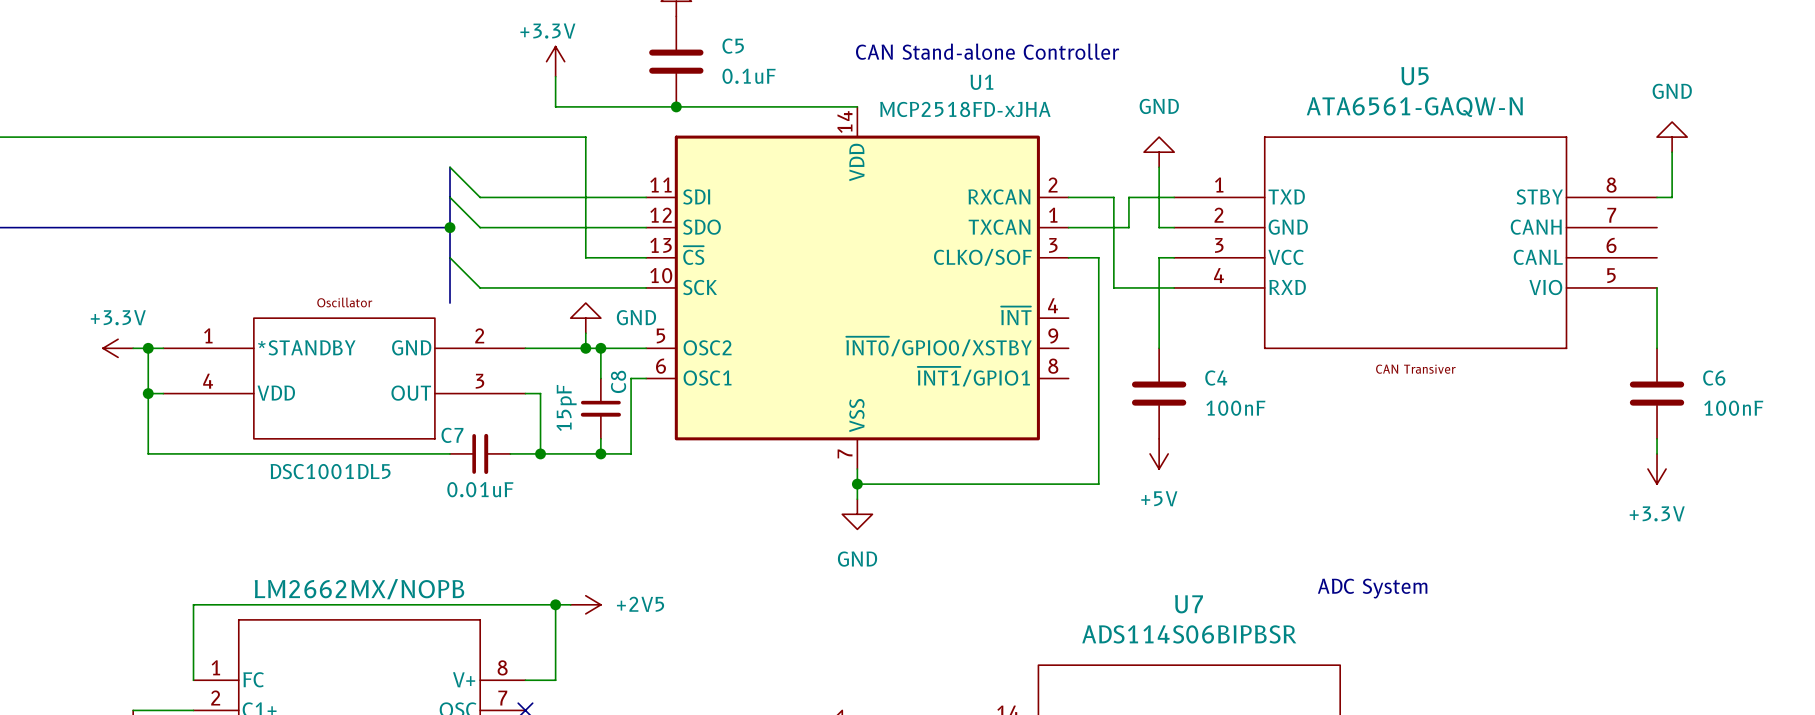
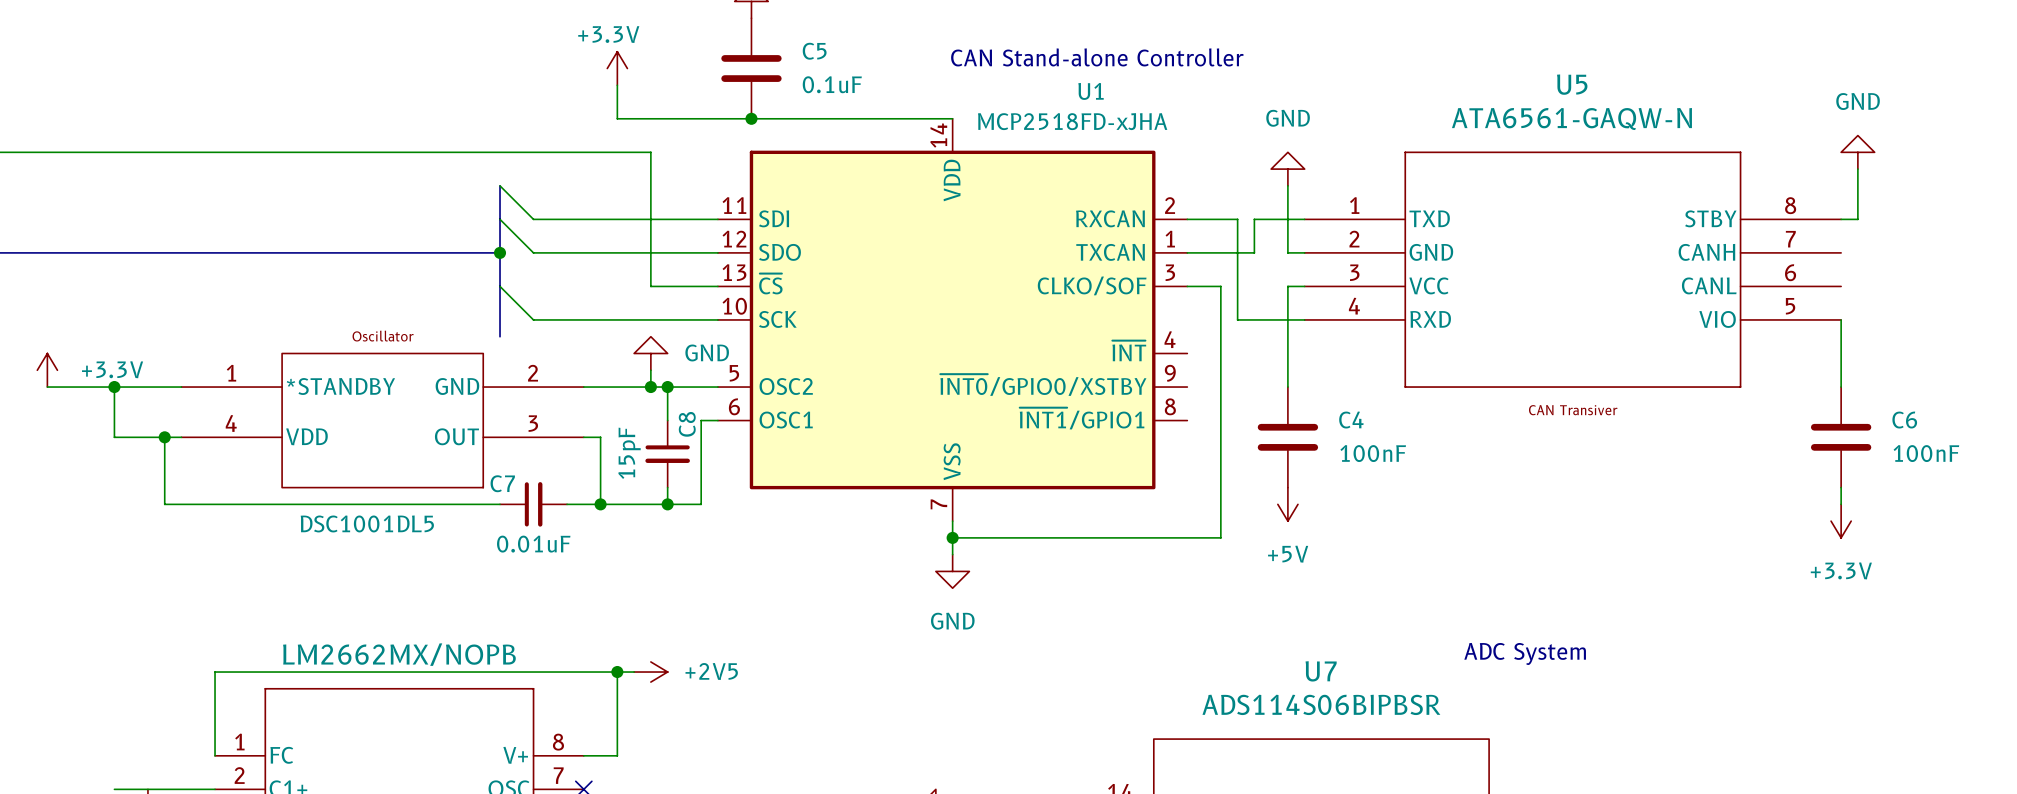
power symbol text position: +3.3V (118, 317) -> +3.3V (112, 369)
wire: none -> (47, 387) (147, 387)
power symbol rotation: 0° (118, 348) -> 90° clockwise (47, 370)
power symbol position: +3.3V (118, 348) -> +3.3V (47, 370)
wire: (148, 348) (148, 393) -> (114, 387) (114, 437) (164, 437)
junction position: (148, 348) -> (114, 387)
wire: none -> (114, 789) (147, 789)

